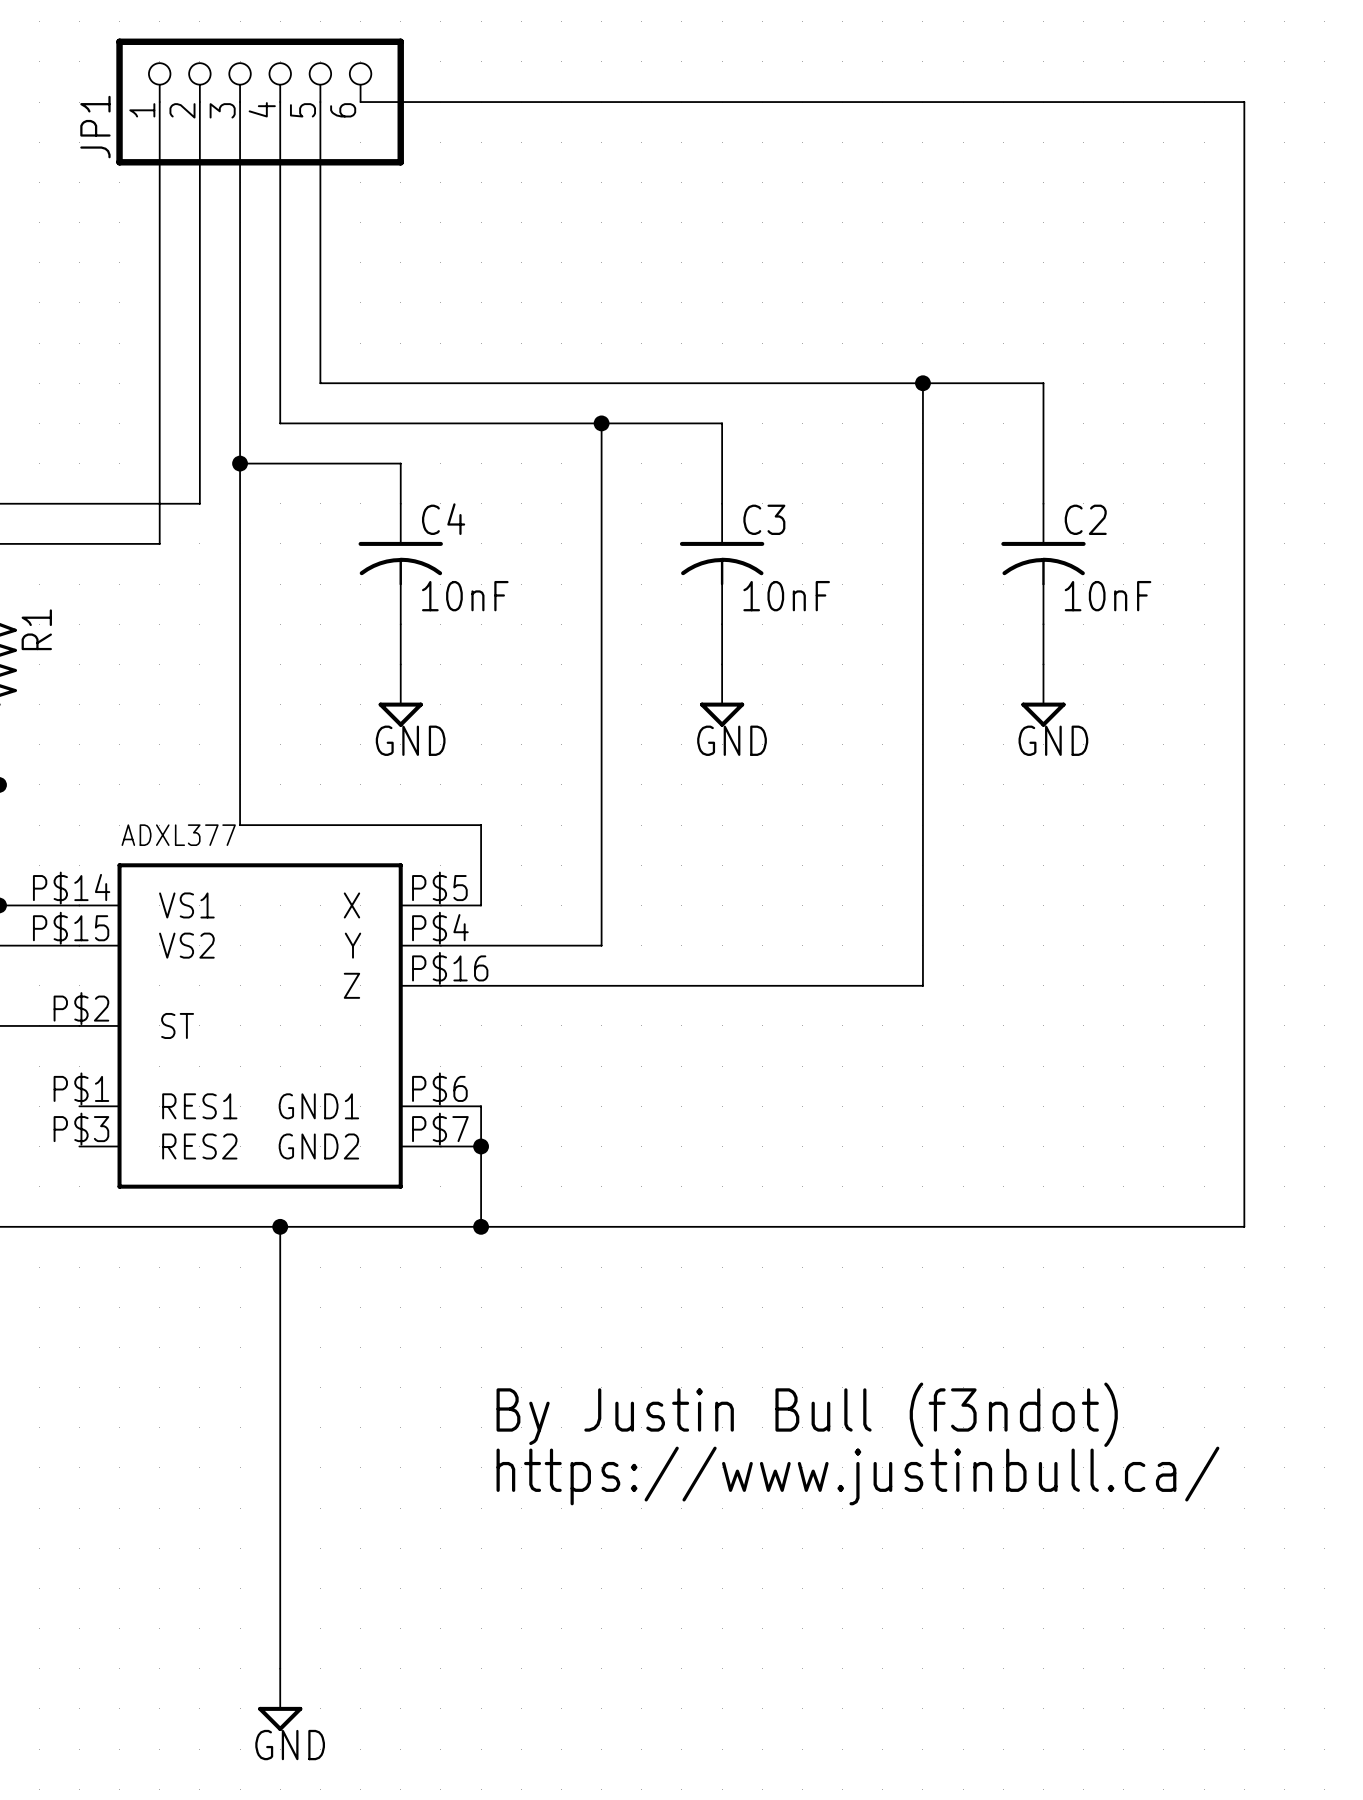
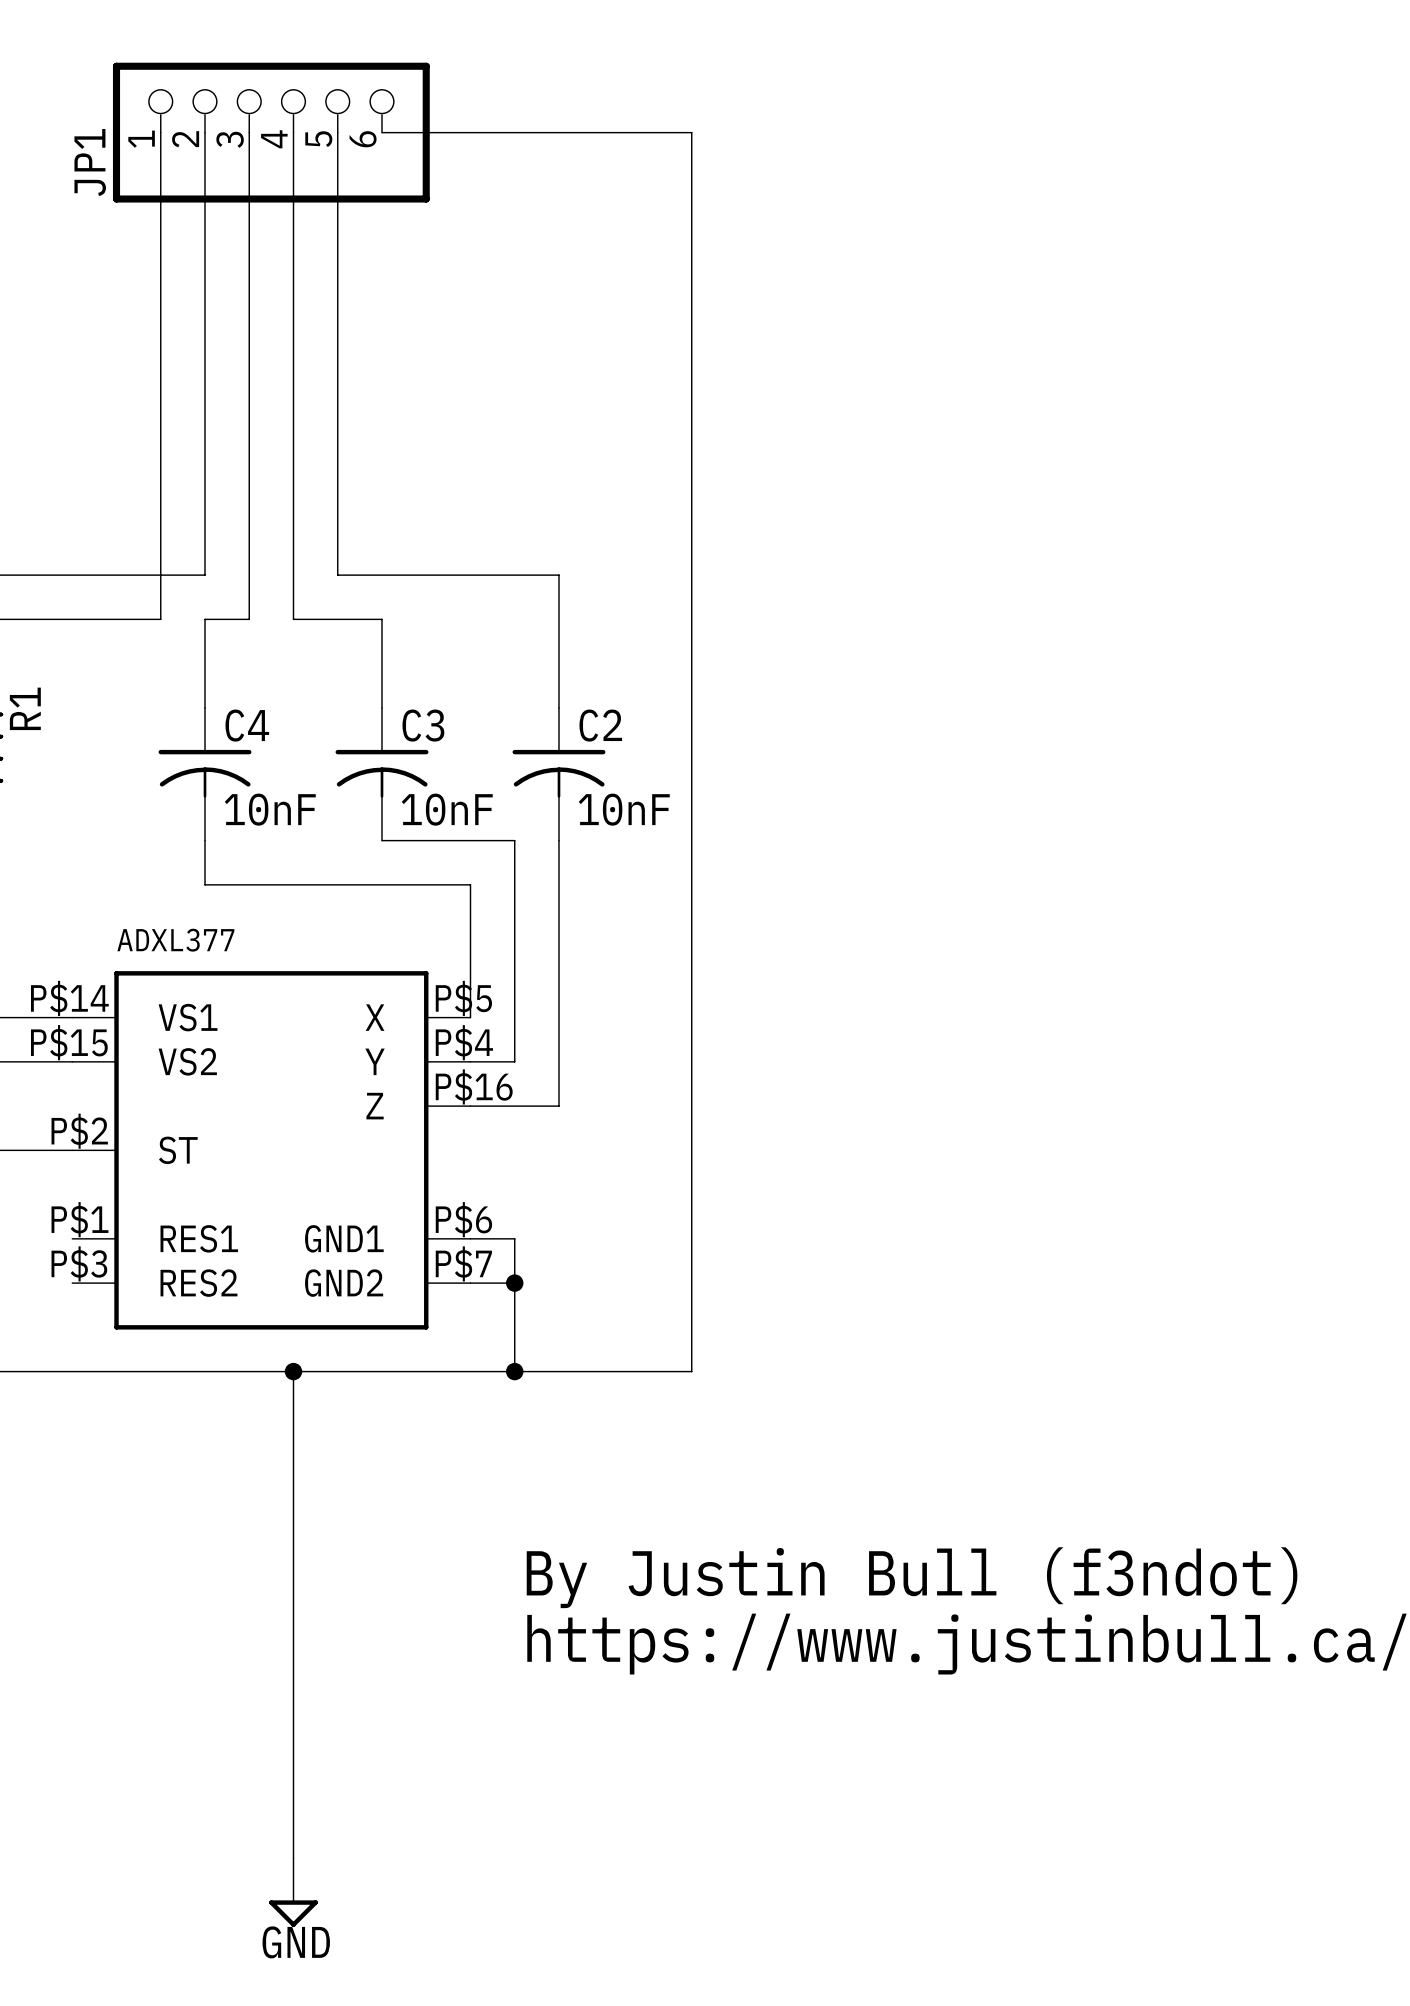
wire: (641, 102) (1244, 102) (1244, 1226) (641, 1226) -> (691, 132) (691, 1371)
wire: (320, 383) (1043, 383) (1043, 503) -> (337, 442) (337, 575) (558, 575) (558, 707)
wire: (922, 383) (922, 985) (521, 985) -> (558, 840) (558, 1106)
junction: (922, 383) -> none
wire: (280, 423) (722, 423) (722, 503) -> (293, 486) (293, 619) (381, 619) (381, 707)
wire: (601, 423) (601, 945) (481, 945) -> none
junction: (601, 423) -> none
wire: (240, 463) (400, 463) (400, 503) -> none
junction: (240, 463) -> none
wire: (240, 543) (240, 825) (481, 825) -> (381, 840) (514, 840) (514, 929)
wire: none -> (249, 619) (205, 619) (205, 707)
C4 position: (400, 564) -> (205, 774)
C3 position: (722, 564) -> (381, 774)
C2 position: (1043, 564) -> (558, 774)
wire: (400, 624) (400, 664) -> none
wire: (722, 624) (722, 664) -> none
wire: (1043, 624) (1043, 664) -> none
power symbol: GND (400, 695) -> none
power symbol: GND (722, 695) -> none
power symbol: GND (1043, 695) -> none
wire: none -> (205, 840) (205, 884) (470, 884) (470, 1017)
wire: (440, 905) (481, 905) -> (514, 1061) (514, 1017)

